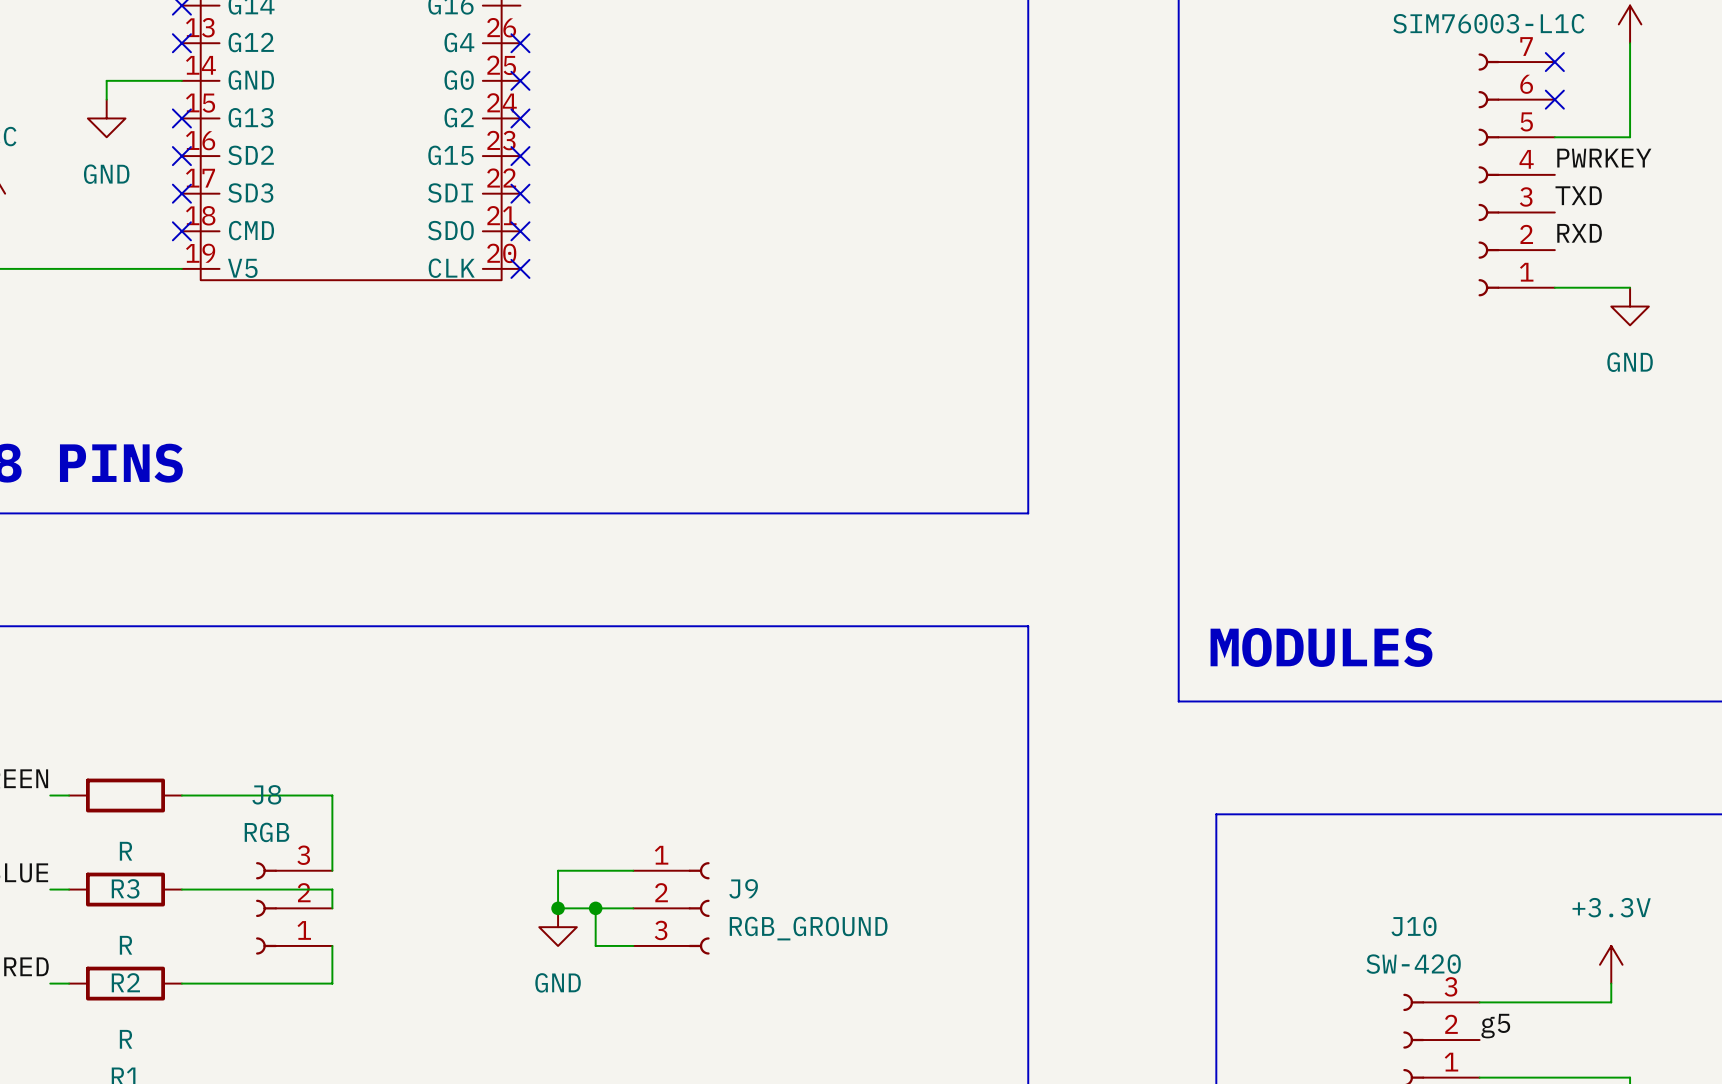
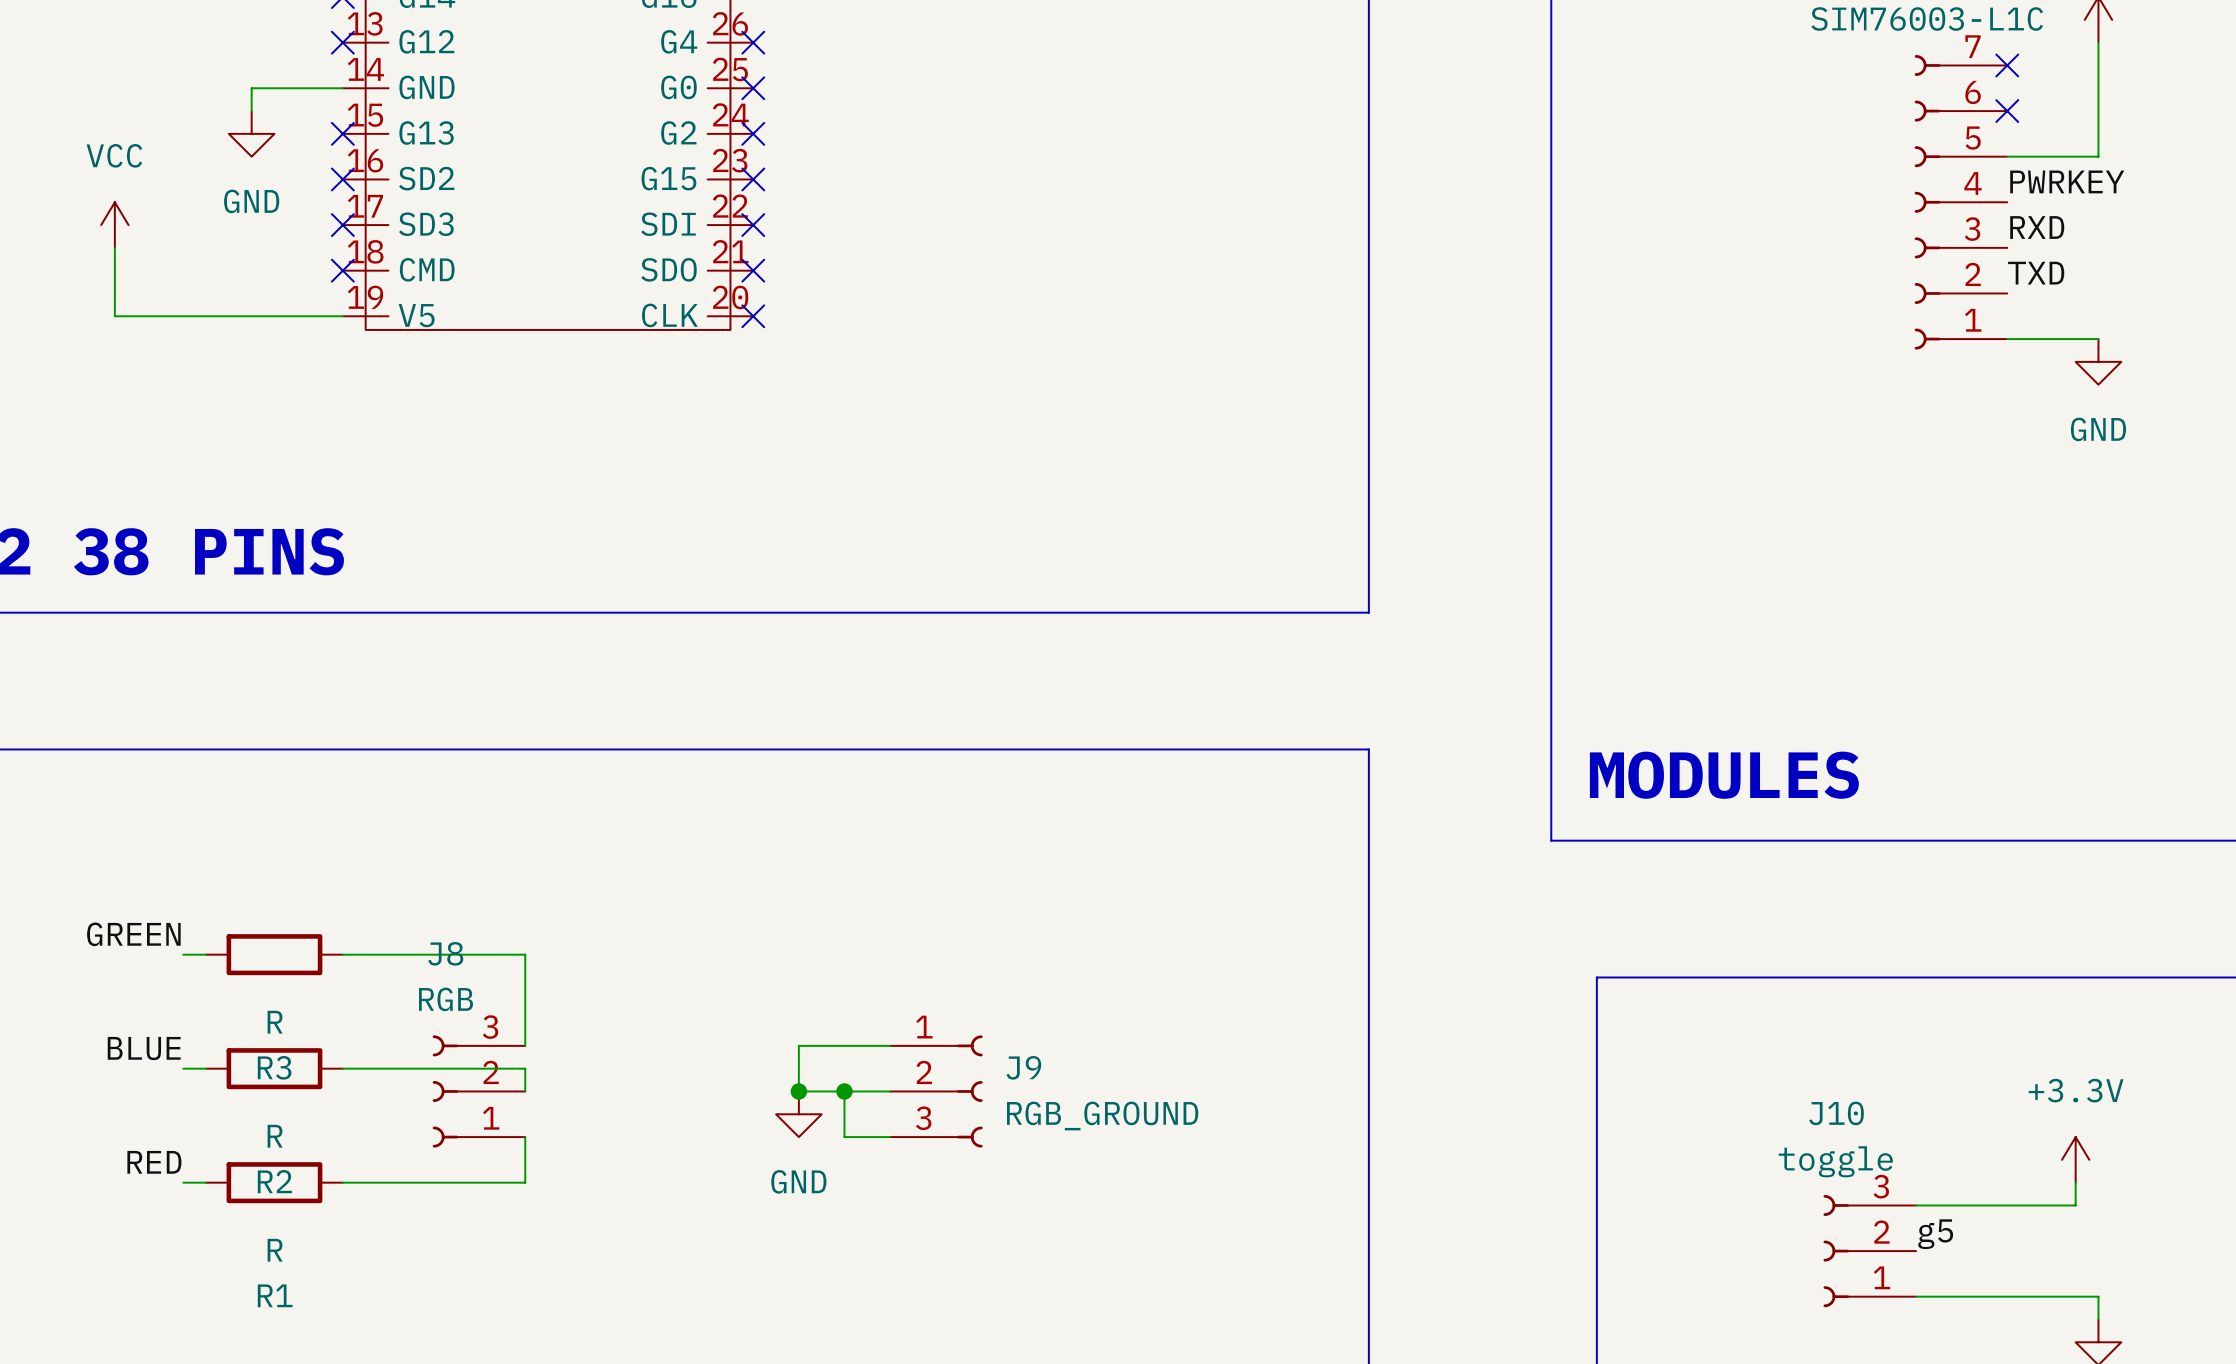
label: TXD (1578, 195) -> RXD (2037, 227)
label: RXD (1579, 233) -> TXD (2036, 273)
J10 value: SW-420 (1413, 964) -> toggle (1835, 1161)

